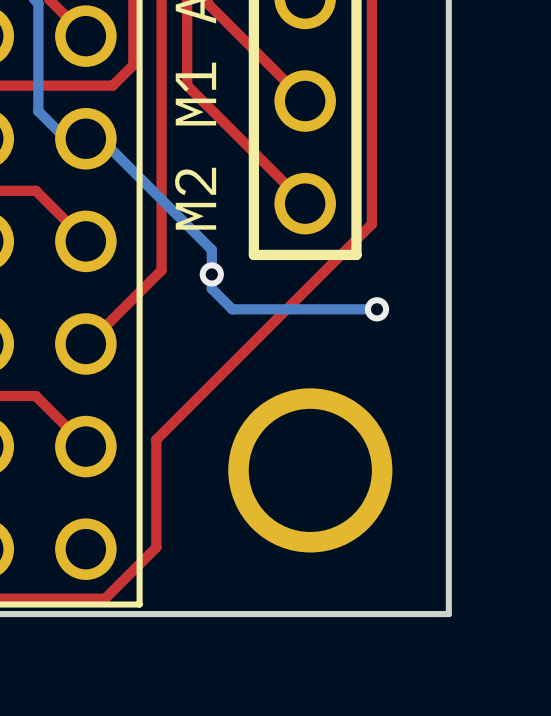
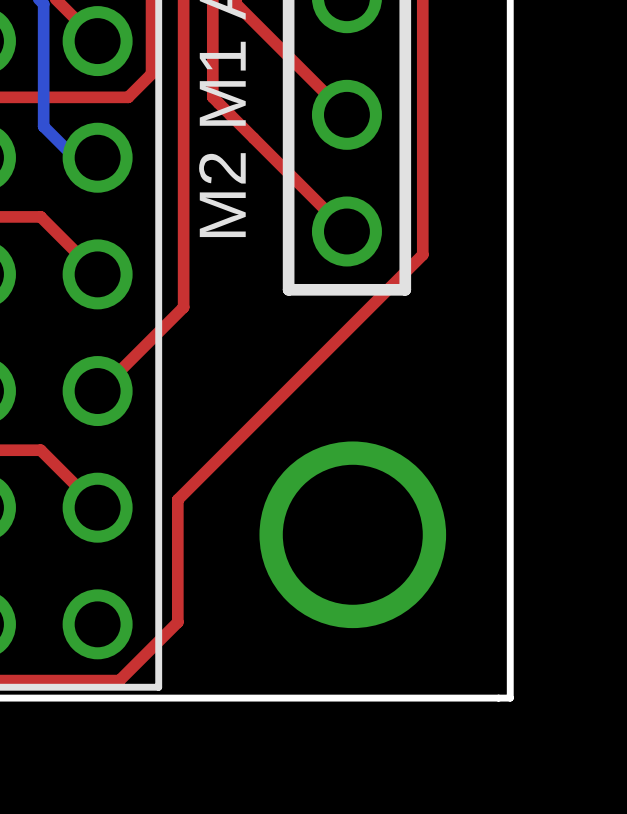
bottom track: (85, 138) (100, 138) (211, 249) (211, 288) (232, 309) (377, 309) -> none
via: (211, 274) -> none
via: (377, 309) -> none

